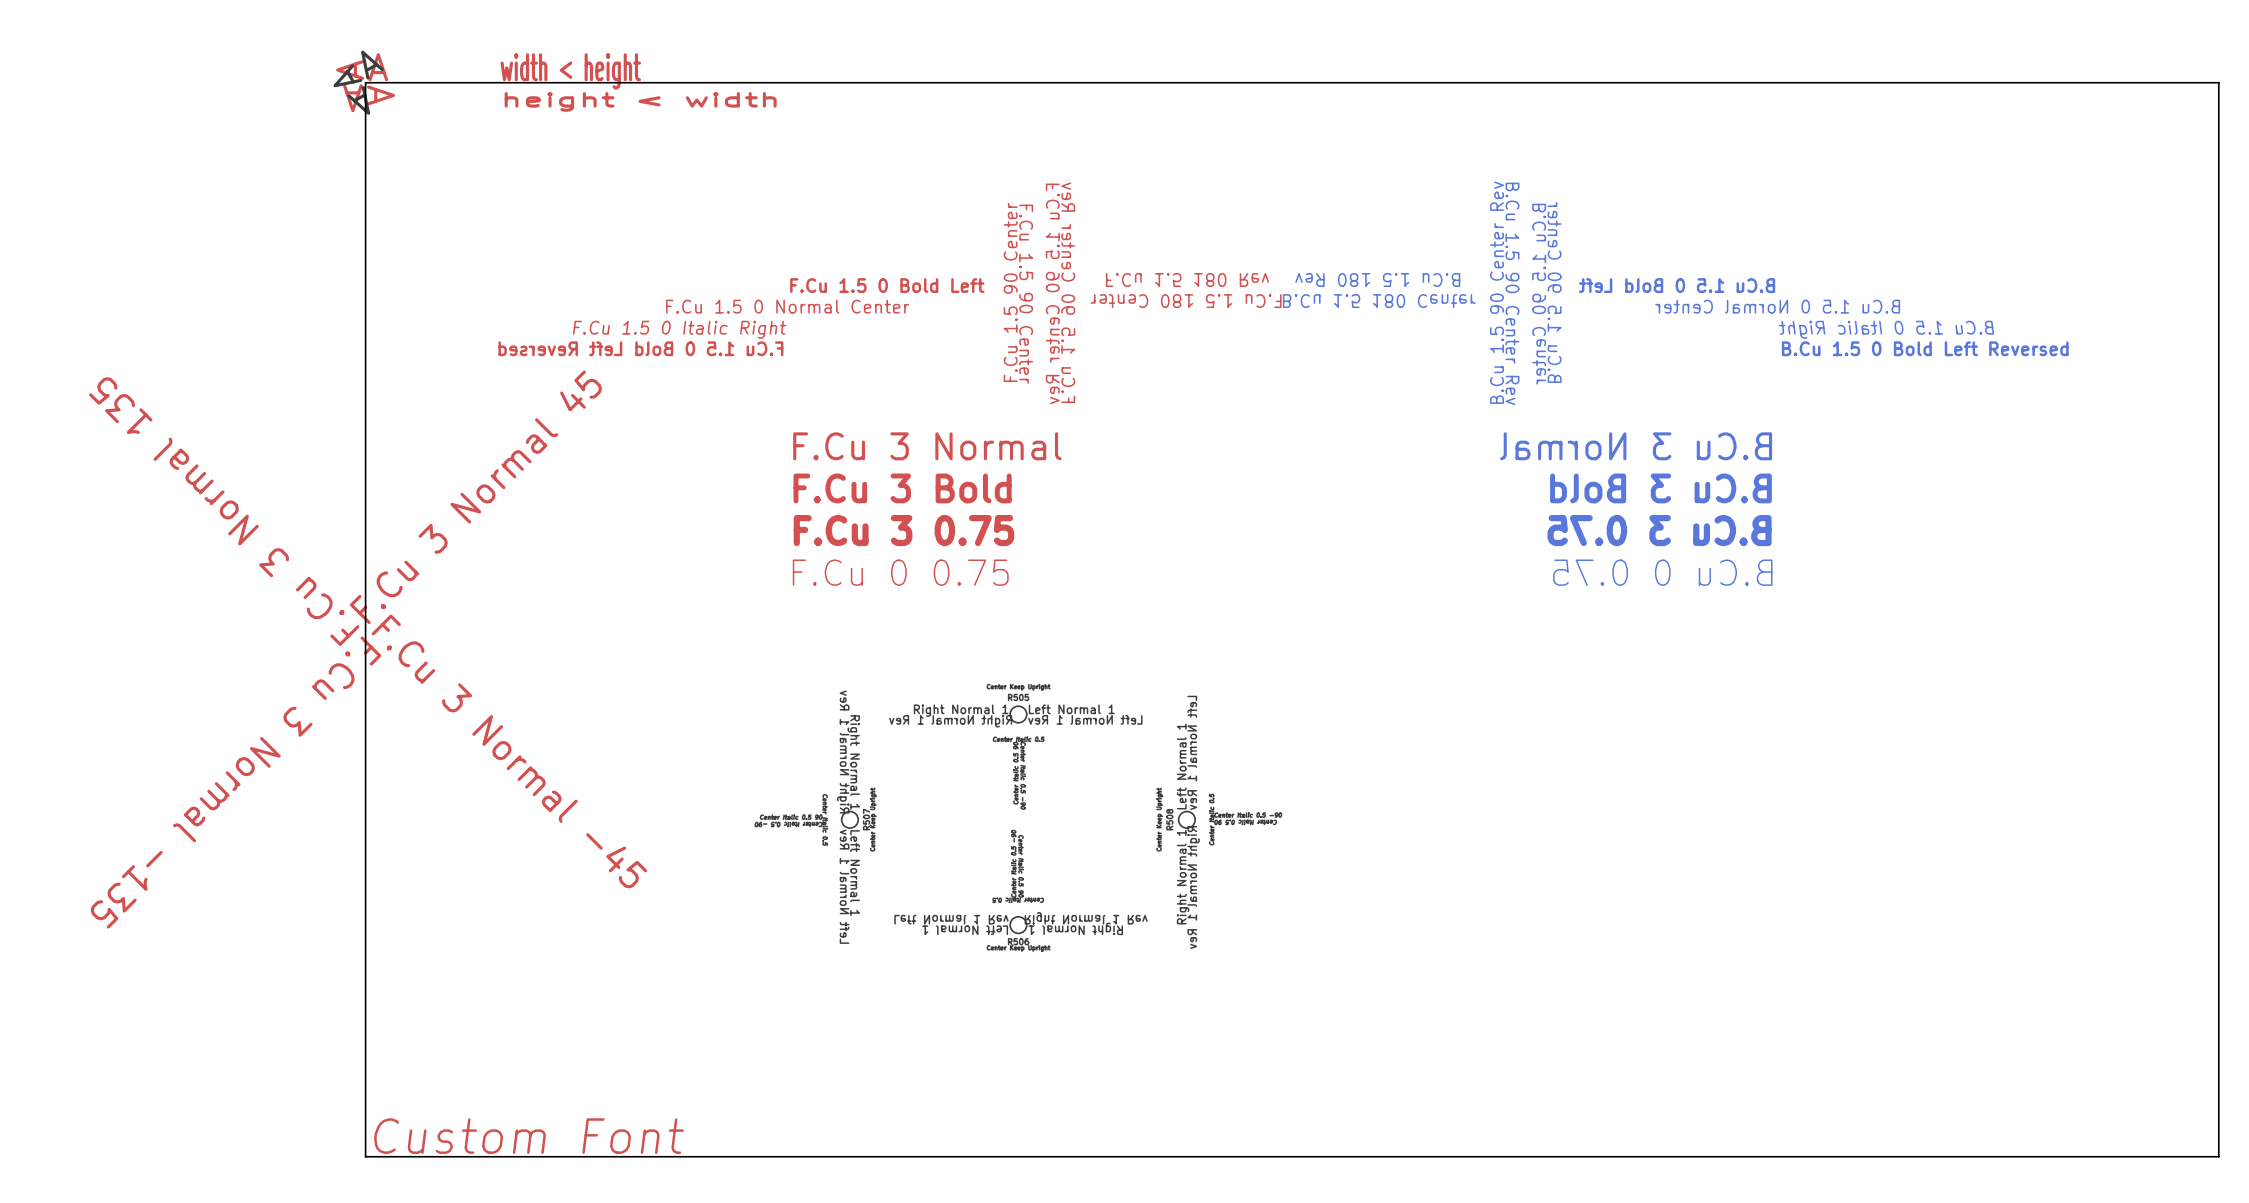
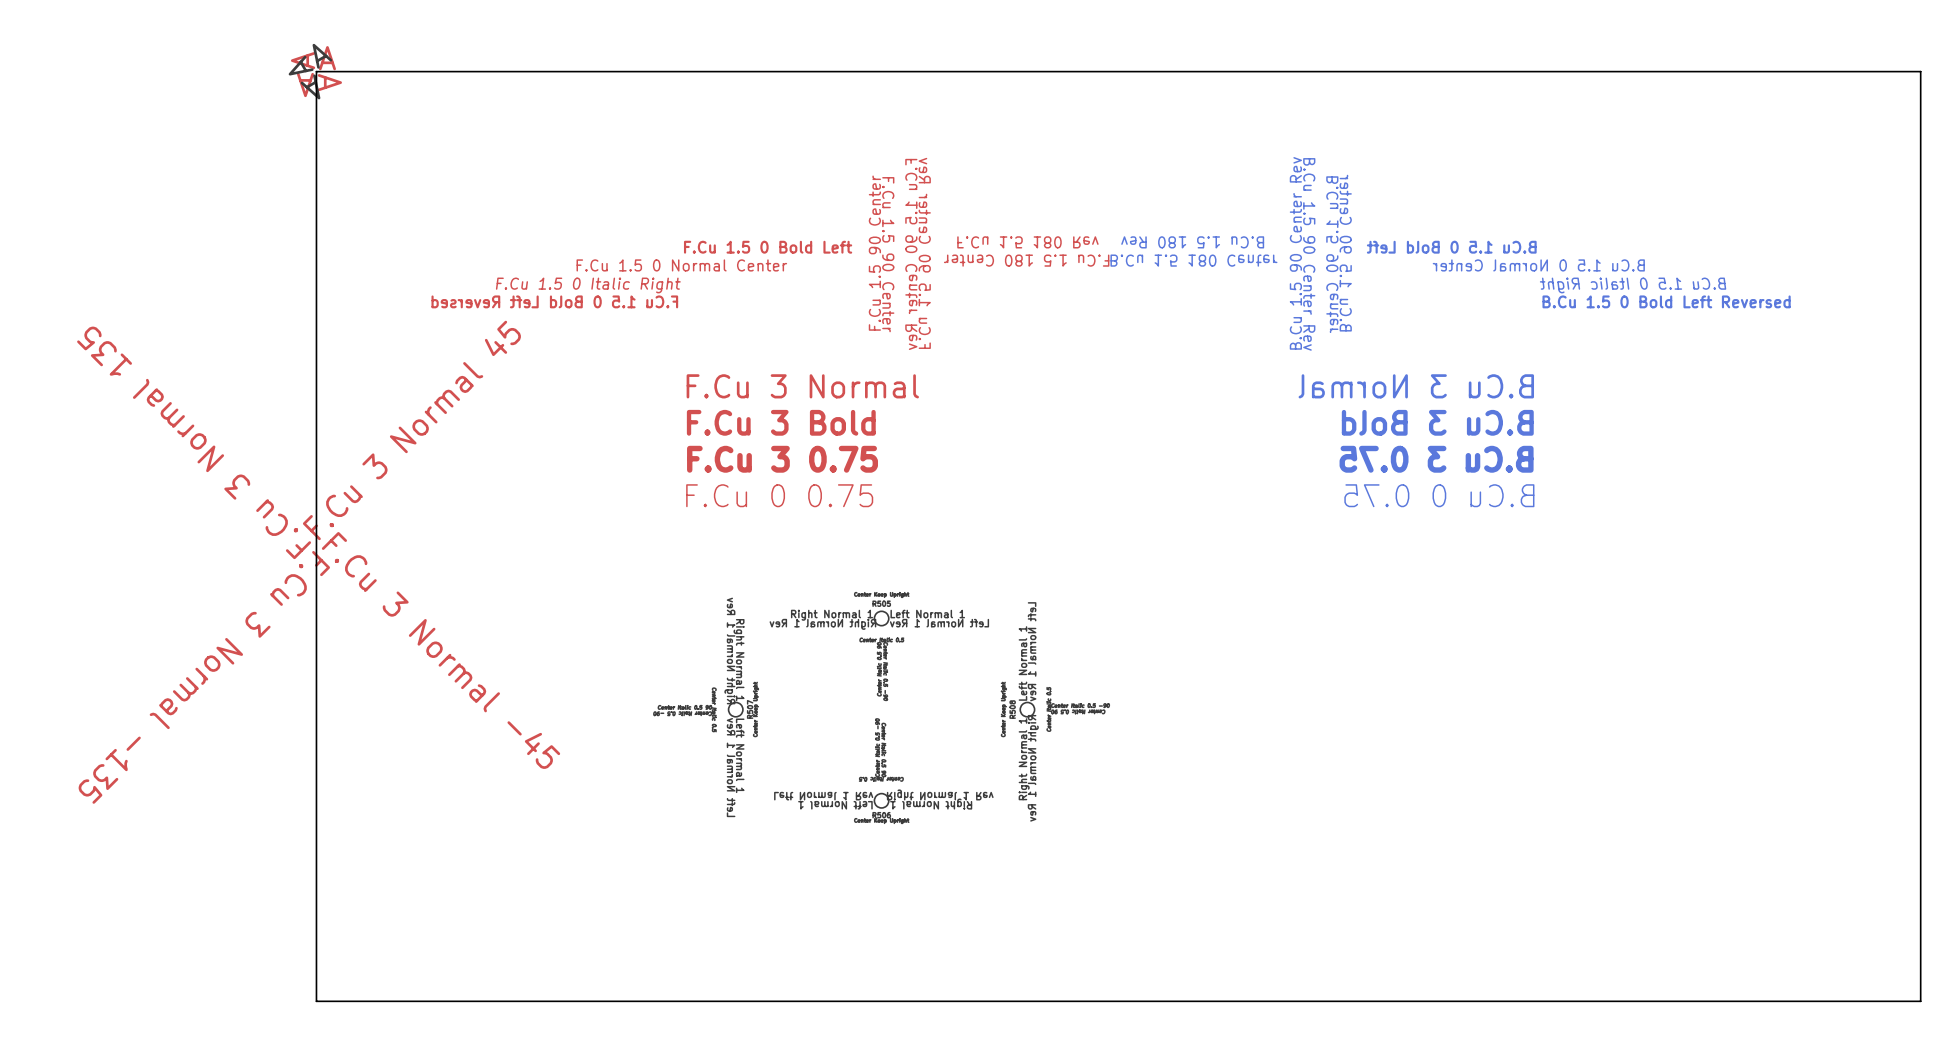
text: width < height (570, 71) -> none
text: height < width (640, 101) -> none
text: Custom Font (529, 1136) -> none

